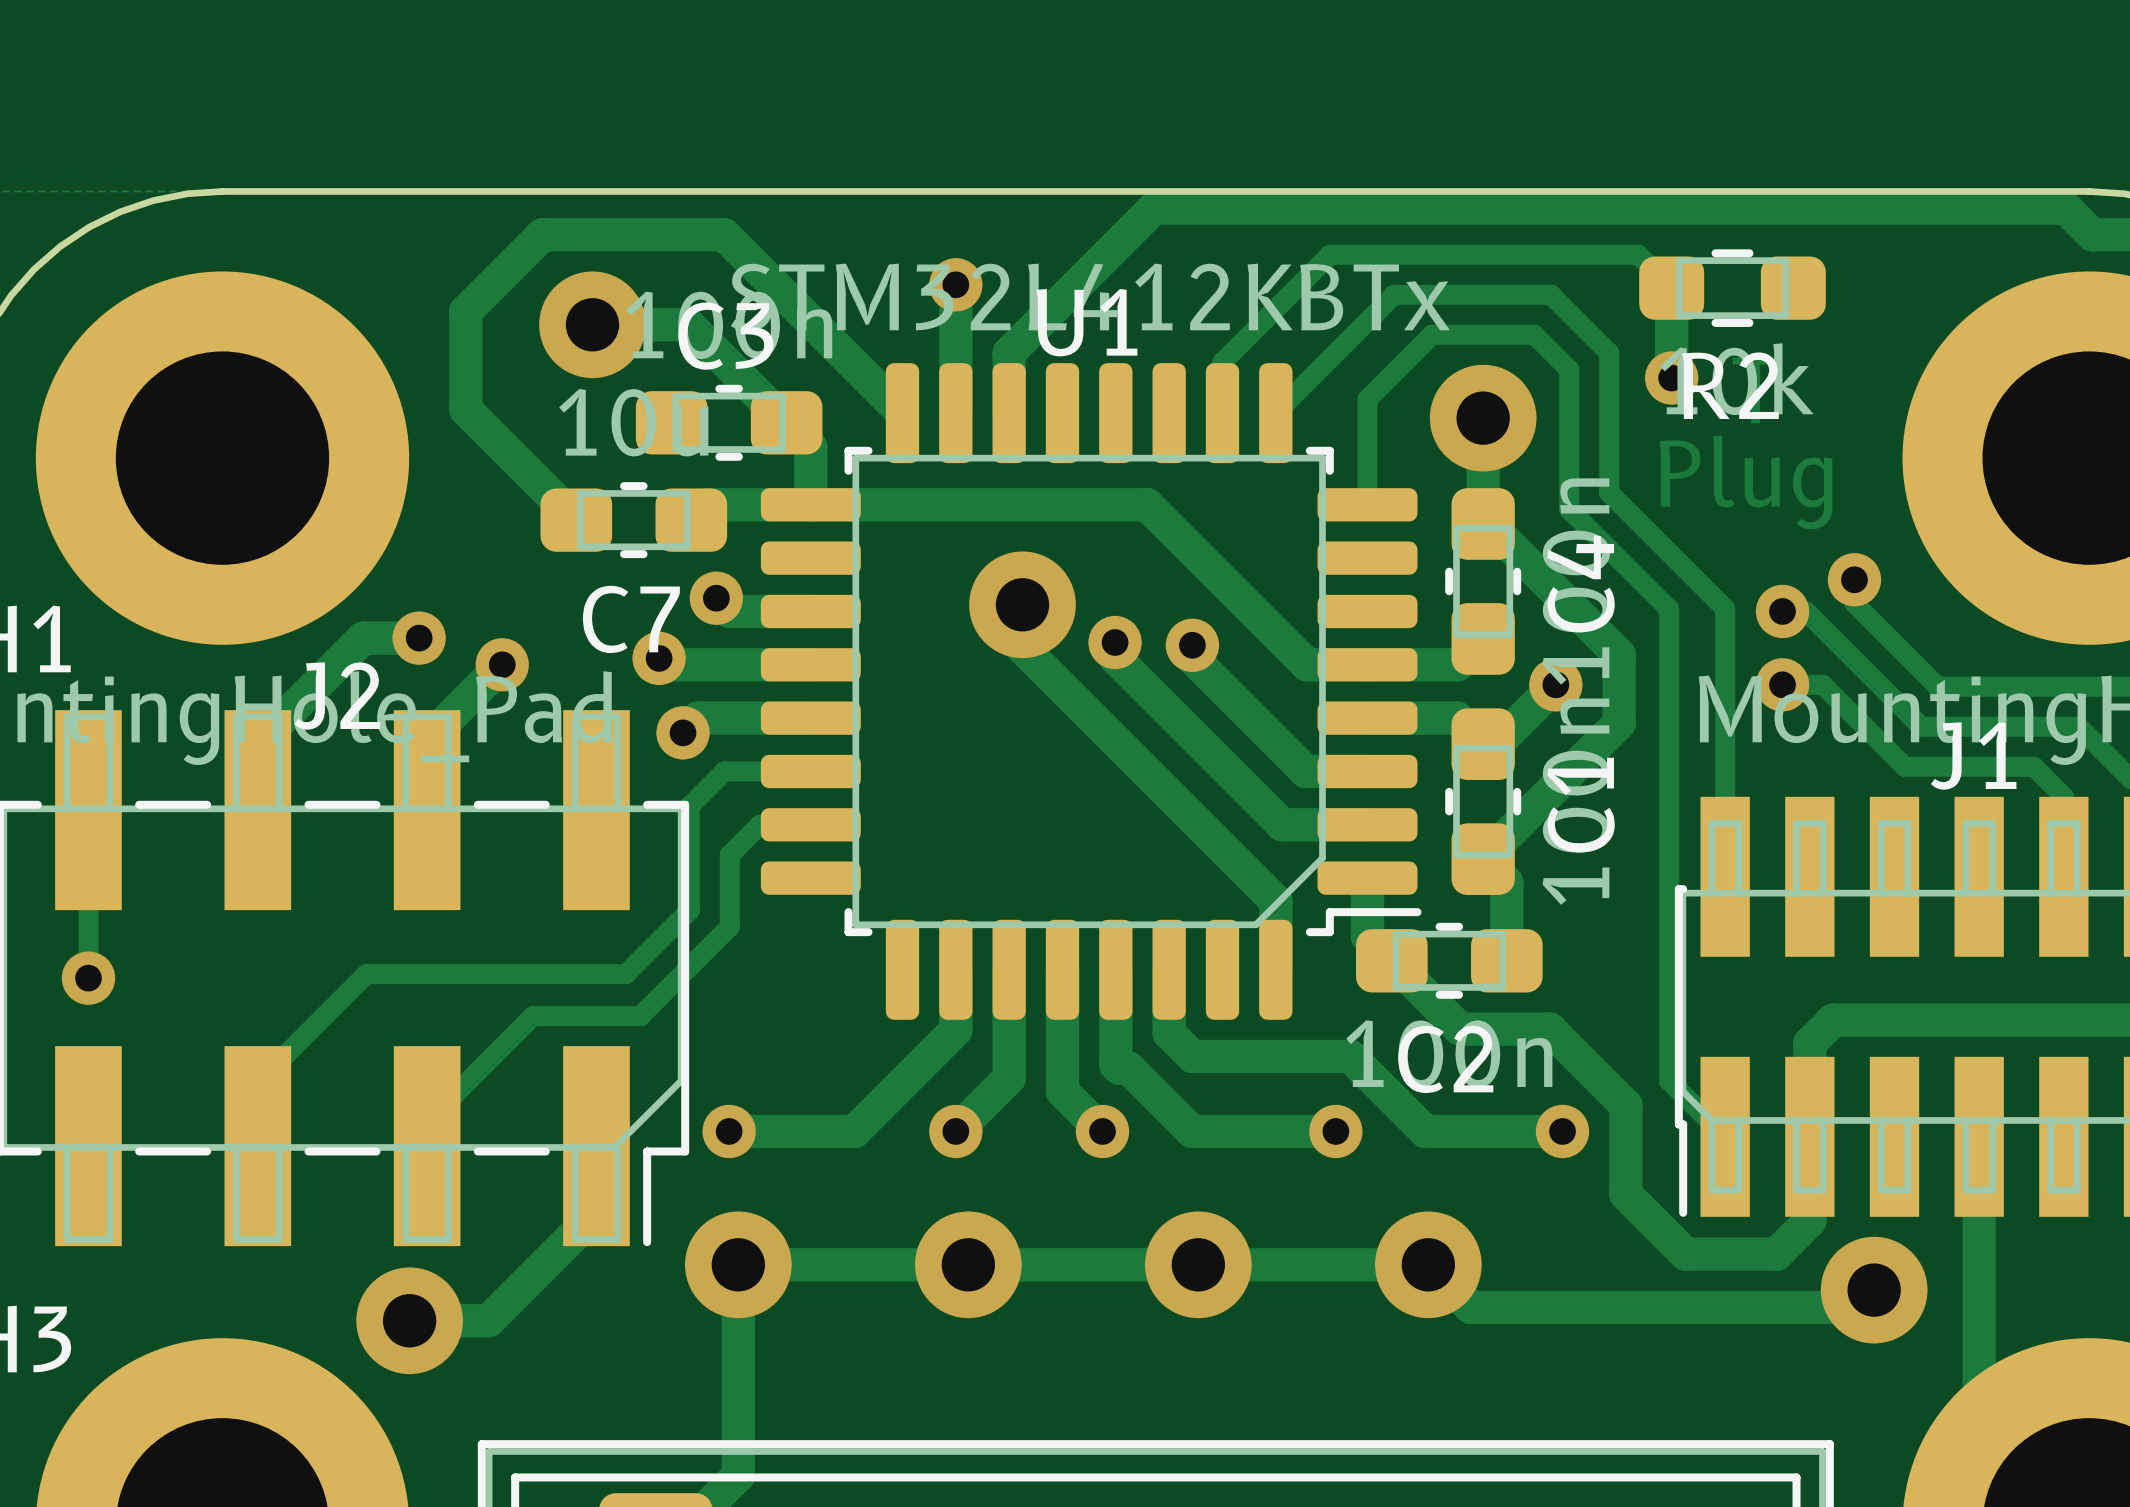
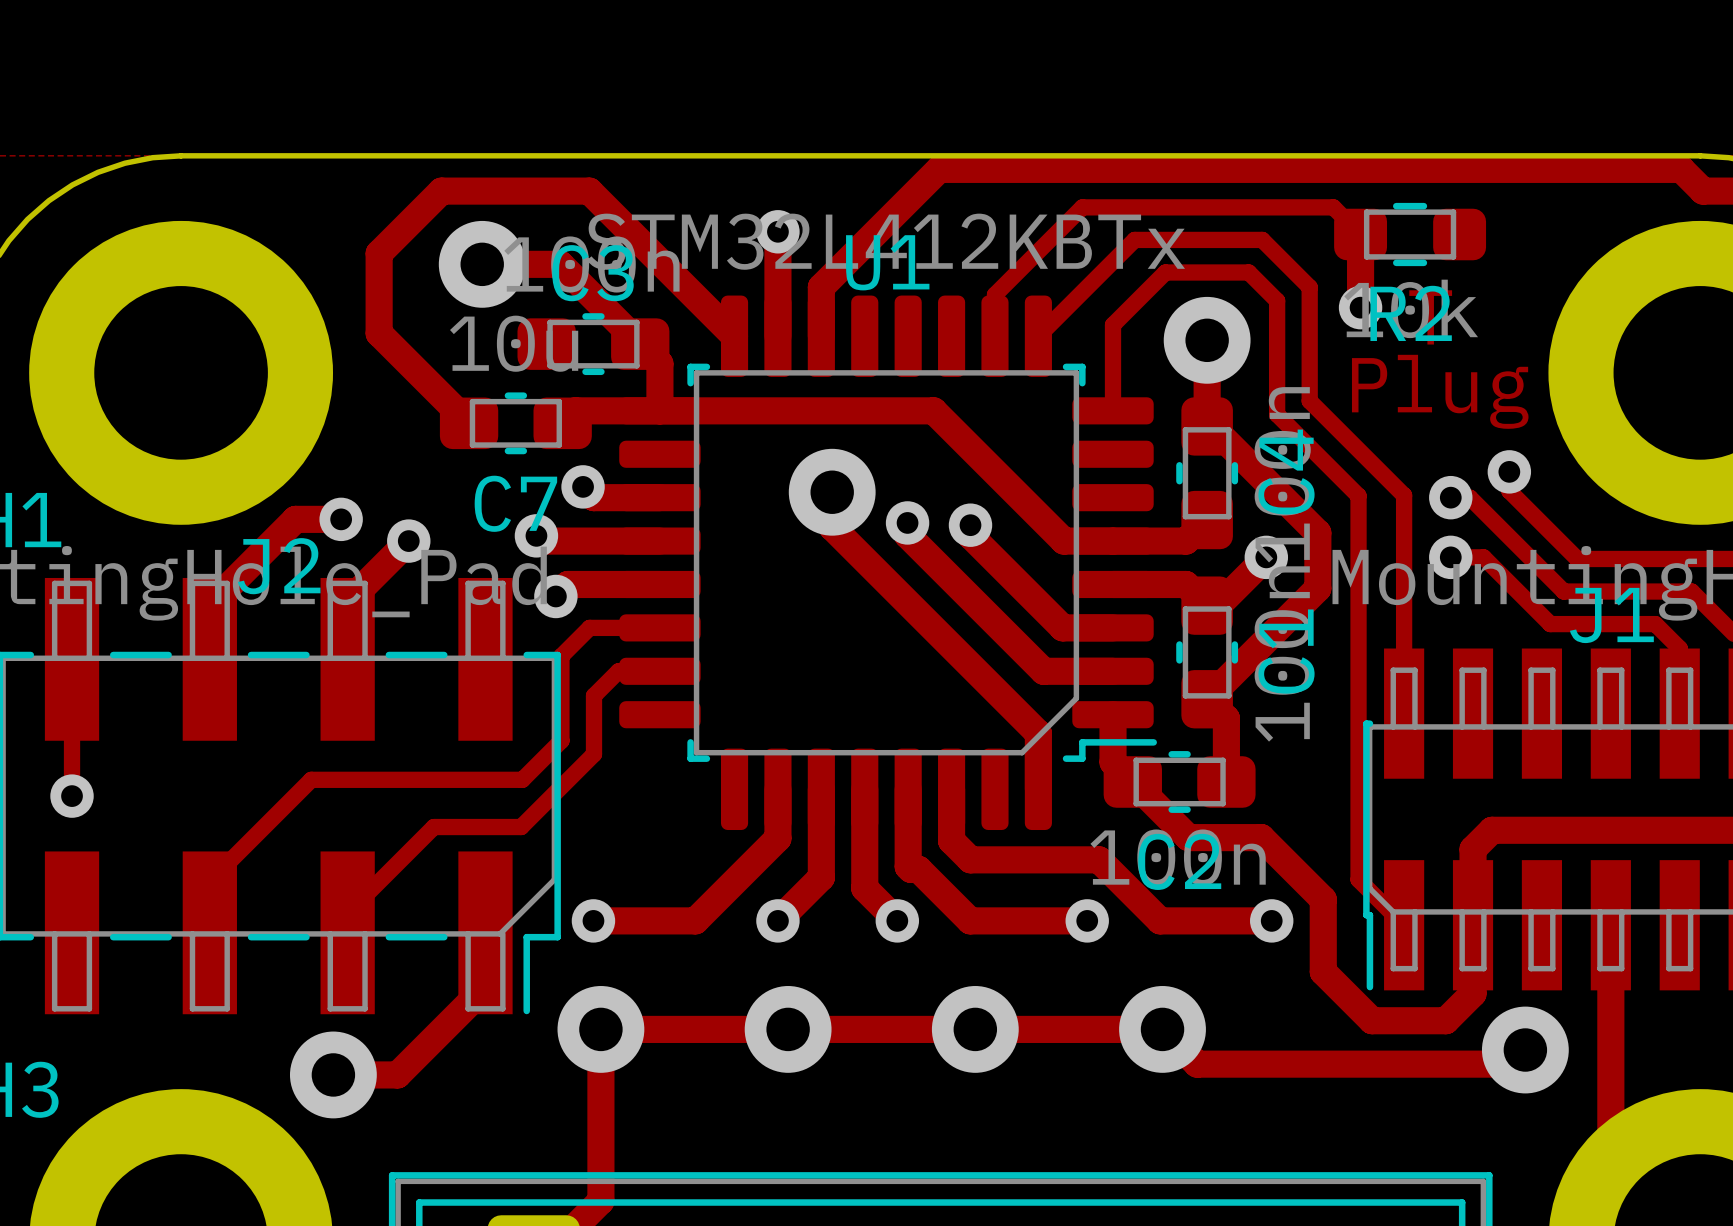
track: (641, 958) (625, 974) (366, 974) -> (522, 779) (311, 779) (298, 792)

